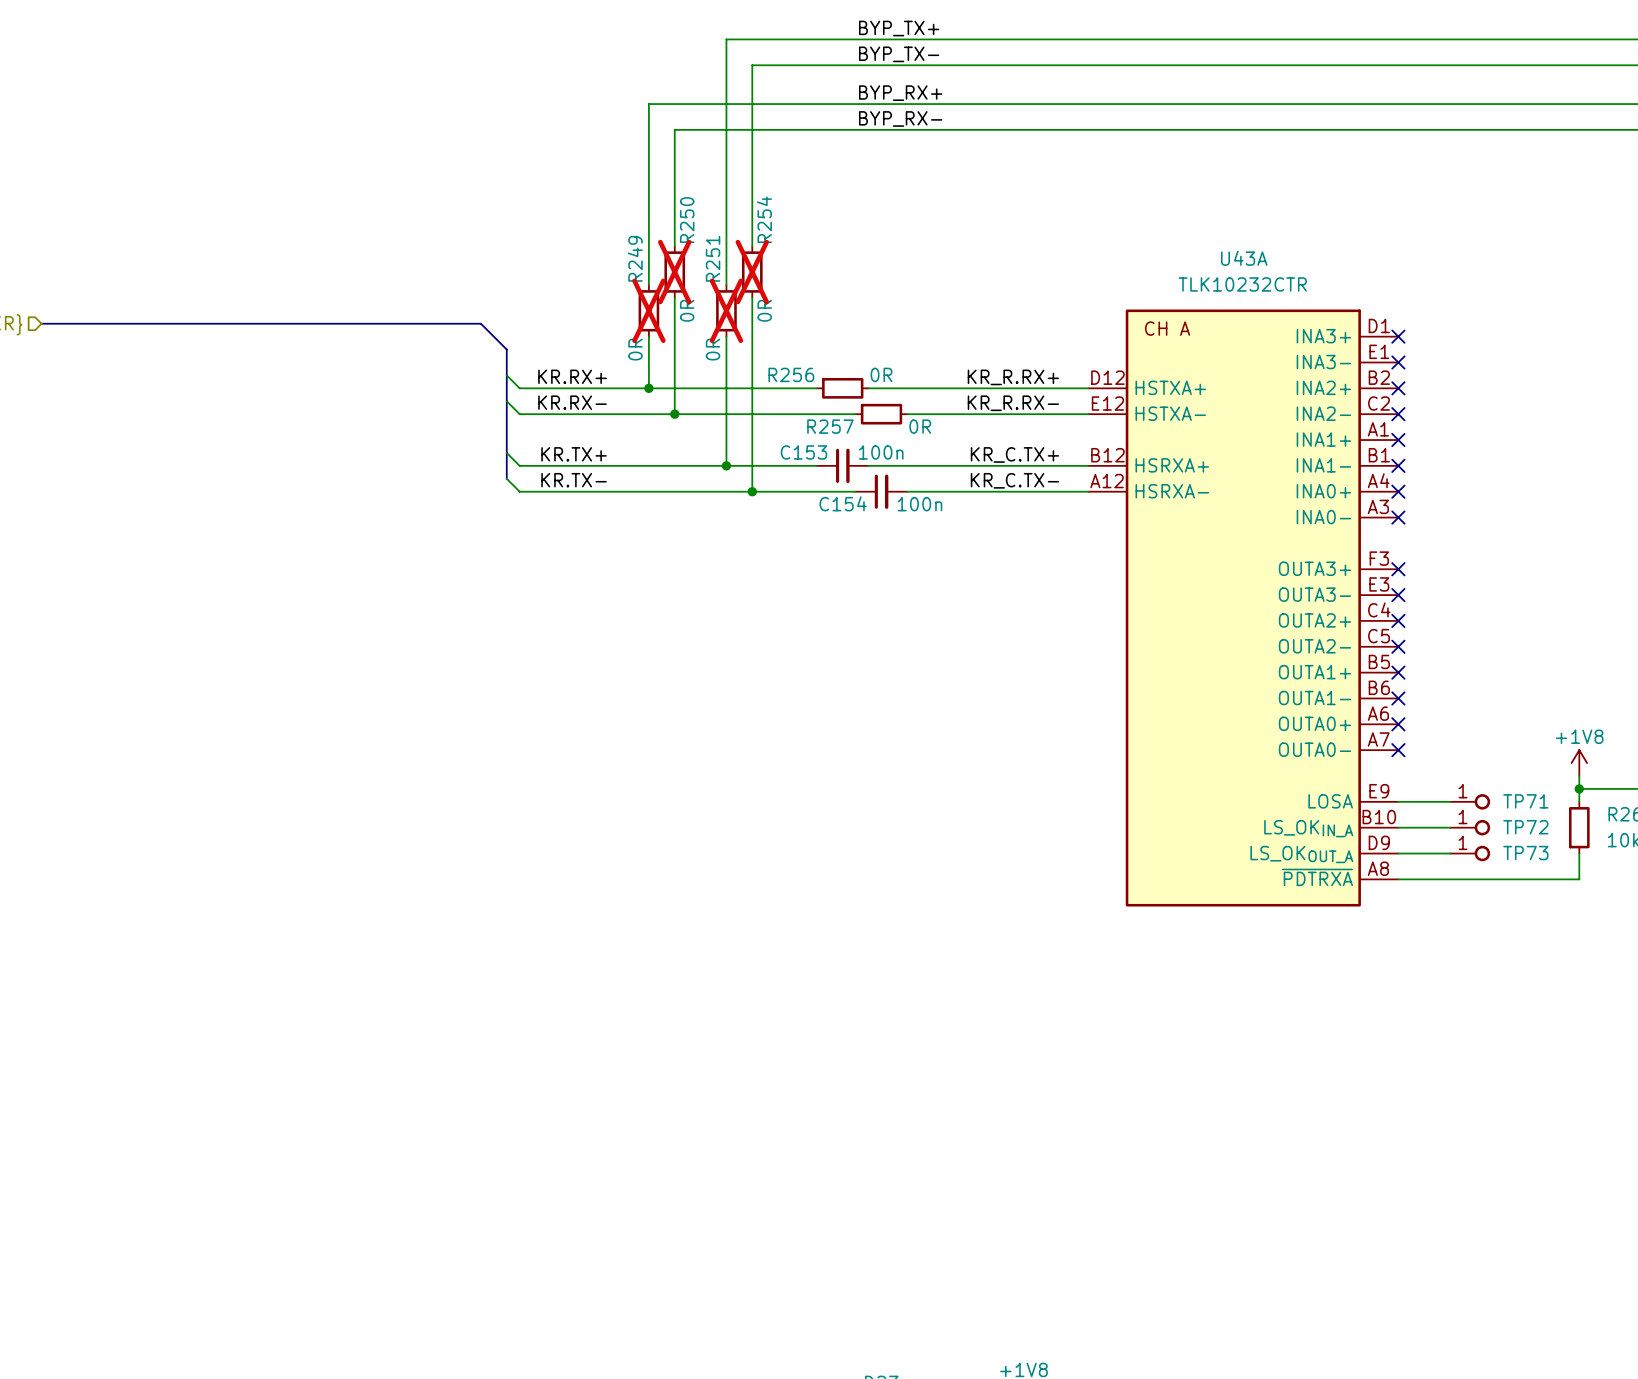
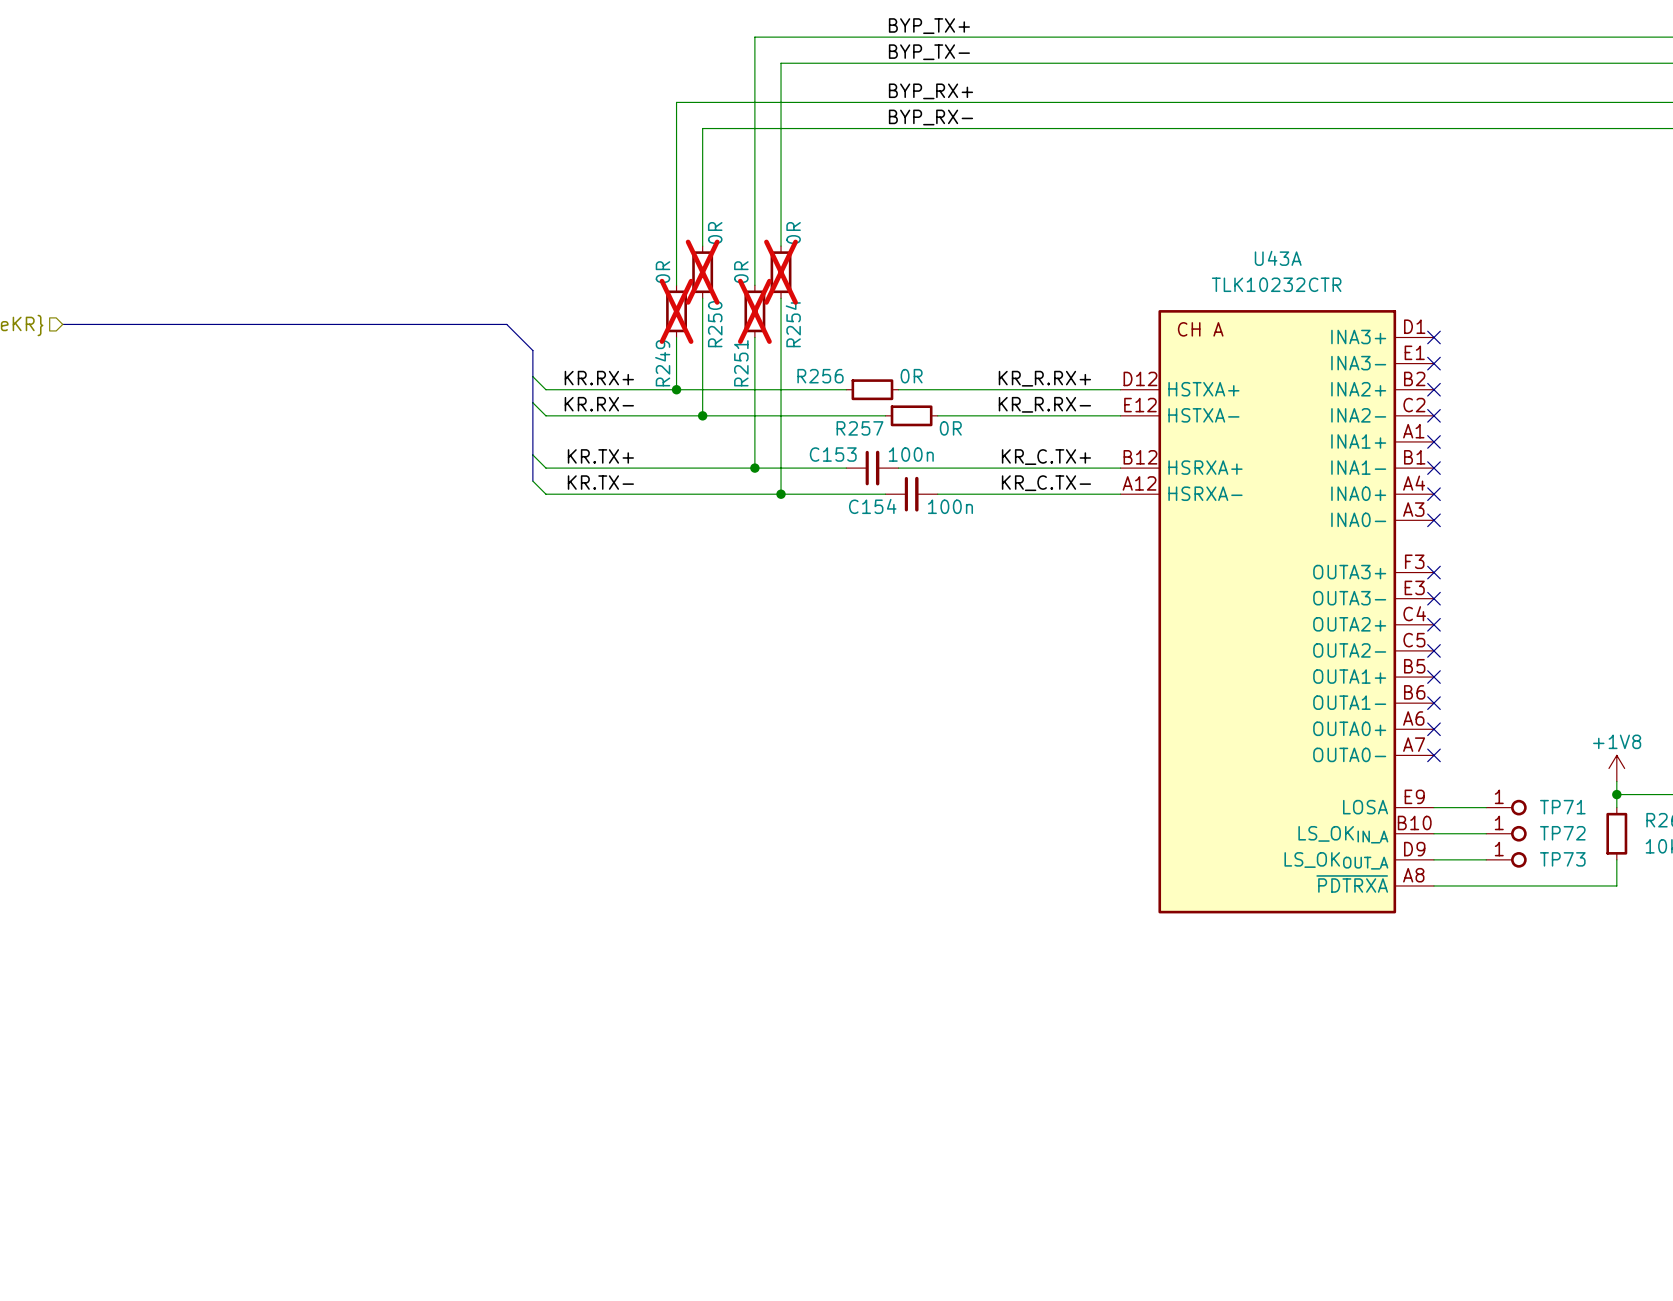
R254 name position: R254 (764, 219) -> R254 (793, 323)
R250 name position: R250 (687, 220) -> R250 (715, 324)
R249 name position: R249 (635, 258) -> R249 (662, 363)
R251 name position: R251 (713, 258) -> R251 (741, 363)
R250 text position: 0R (687, 310) -> 0R (715, 233)
R254 text position: 0R (764, 310) -> 0R (793, 233)
R249 text position: 0R (635, 349) -> 0R (662, 272)
R251 text position: 0R (713, 349) -> 0R (741, 272)

